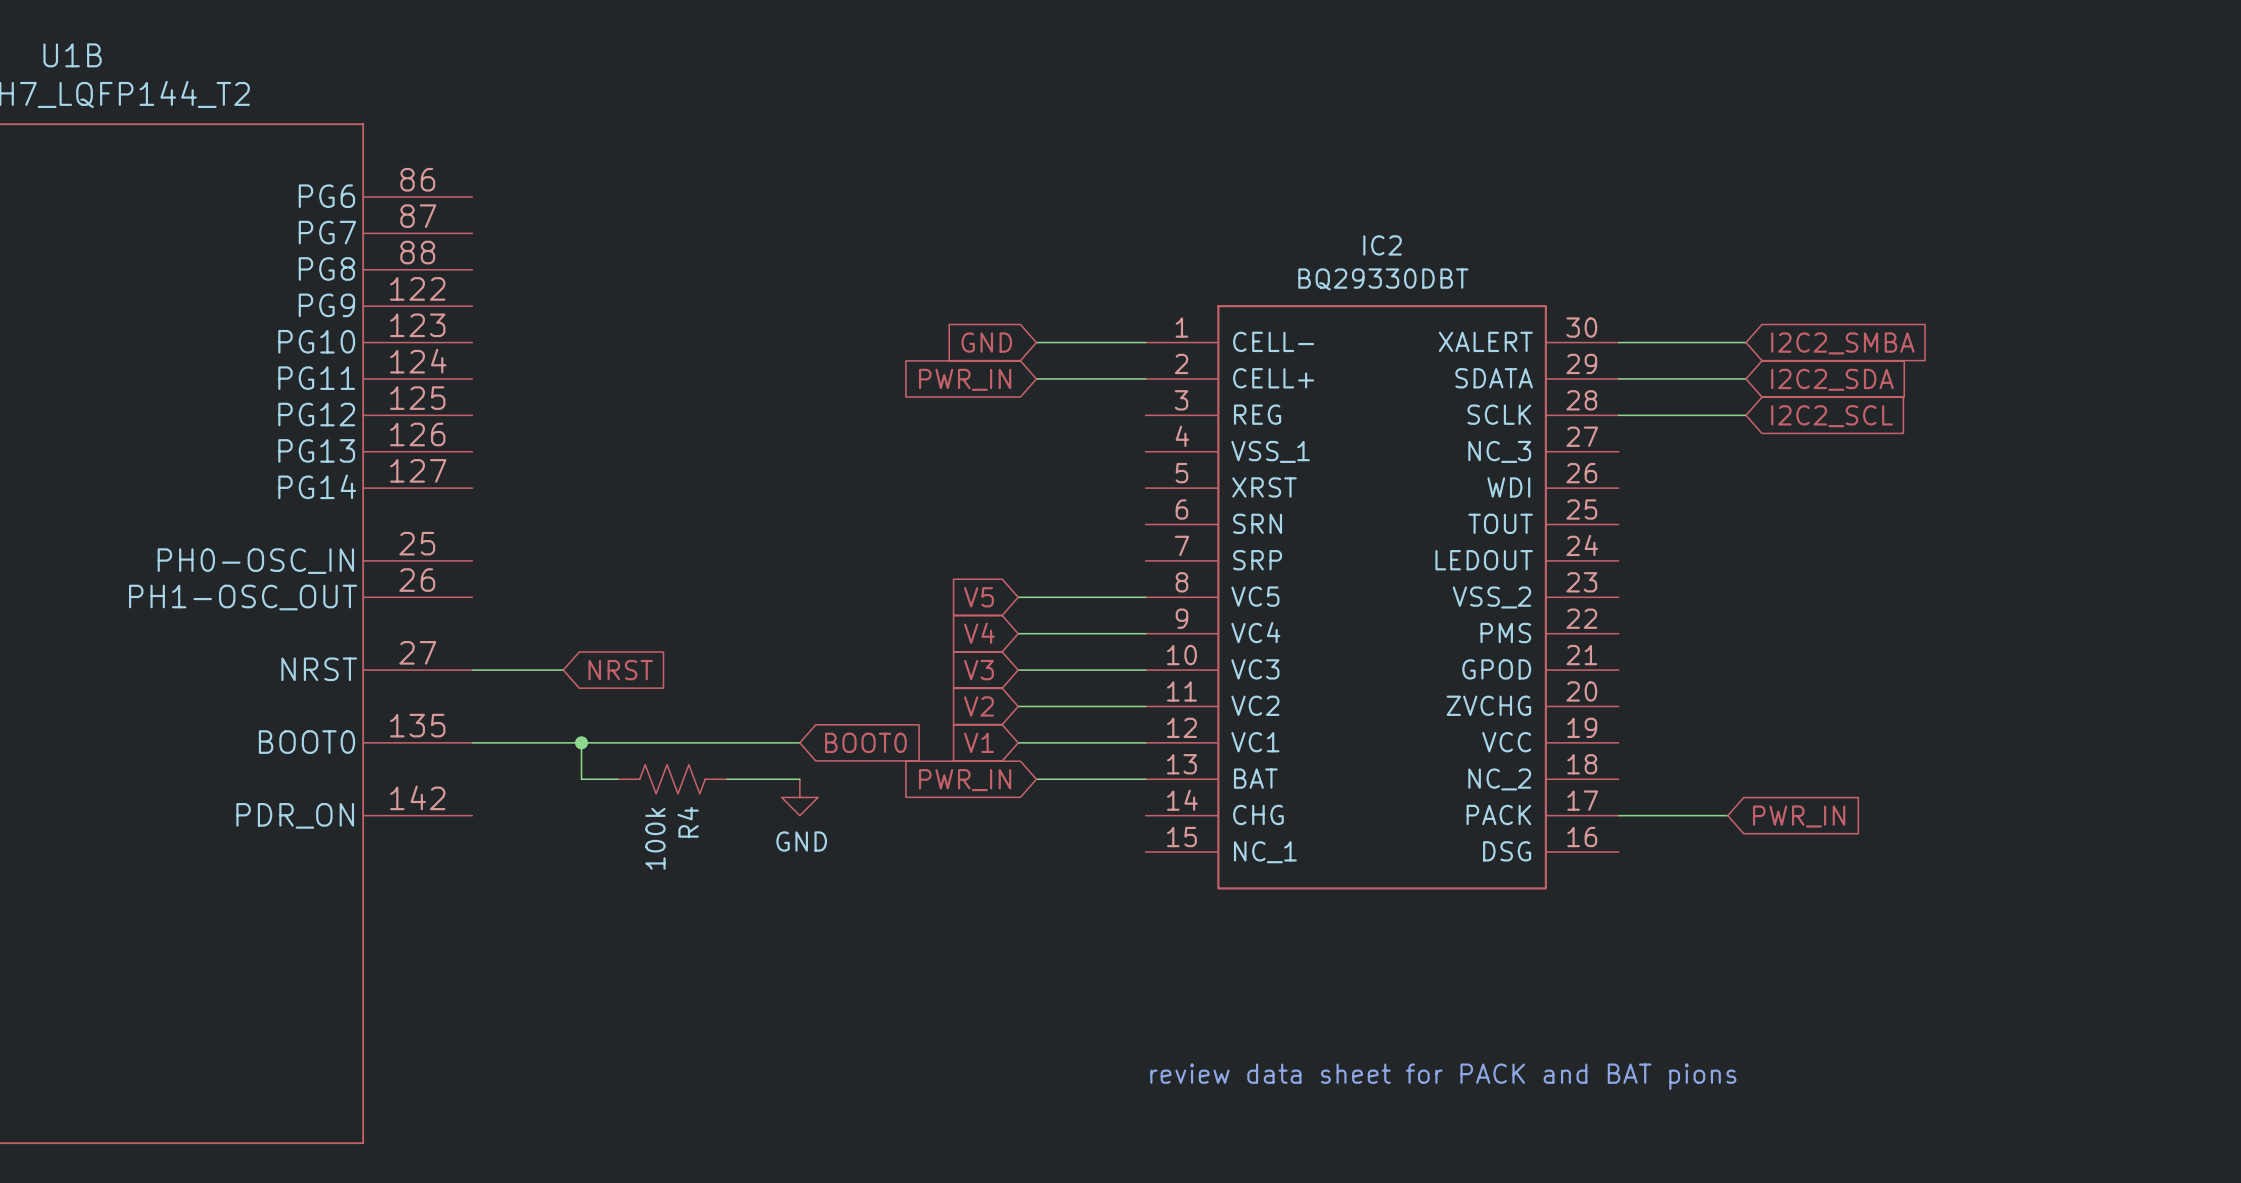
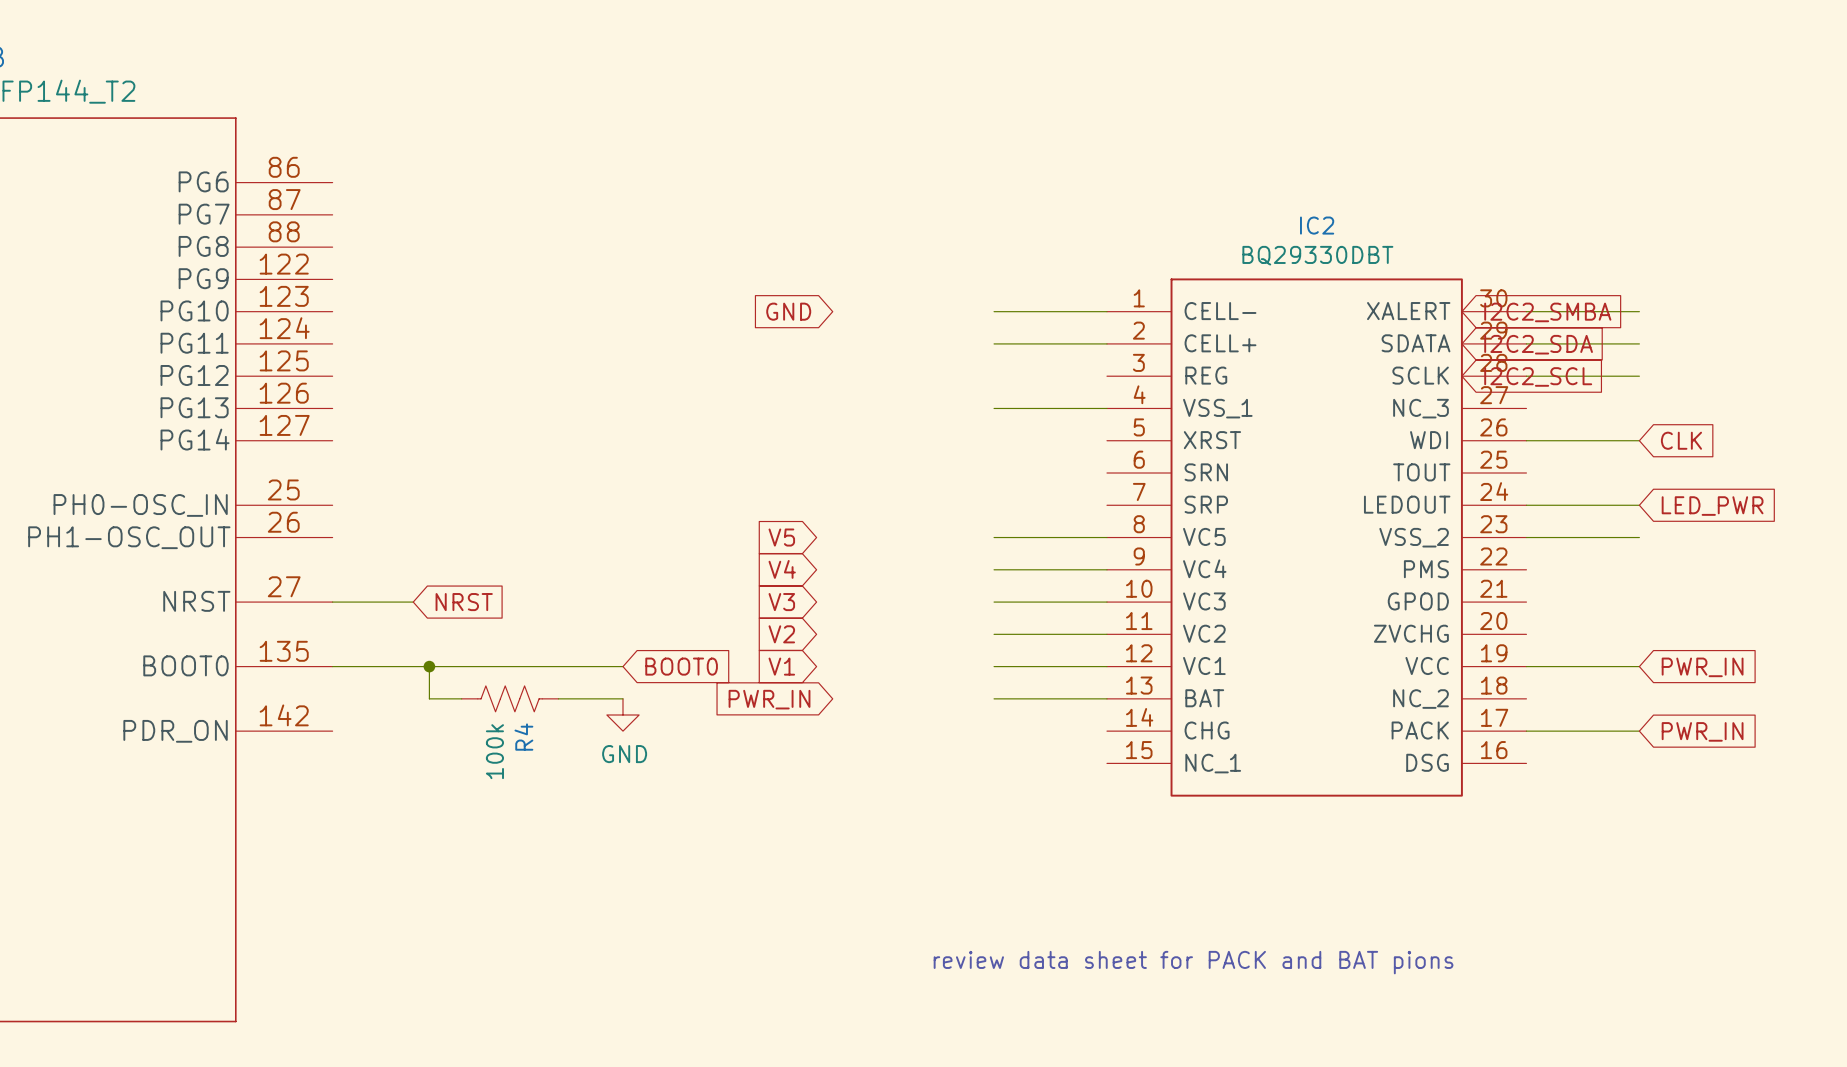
wire: (1036, 342) (1145, 342) -> none
wire: none -> (994, 311) (1106, 311)
wire: (1618, 342) (1746, 342) -> (1526, 311) (1639, 311)
wire: (1036, 378) (1145, 378) -> none
wire: none -> (994, 343) (1106, 343)
wire: (1618, 378) (1746, 378) -> (1526, 343) (1639, 343)
global label: PWR_IN (965, 379) -> none
wire: (1618, 415) (1746, 415) -> (1526, 376) (1639, 376)
wire: none -> (994, 408) (1106, 408)
wire: none -> (1526, 440) (1639, 440)
global label: none -> CLK (1681, 440)
wire: none -> (1526, 505) (1639, 505)
global label: none -> LED_PWR (1712, 506)
wire: (1018, 597) (1145, 597) -> (994, 537) (1106, 537)
IC2 position: (1382, 597) -> (1316, 537)
wire: none -> (1526, 537) (1639, 537)
wire: (1018, 633) (1145, 633) -> (994, 569) (1106, 569)
wire: (1018, 670) (1145, 670) -> (994, 602) (1106, 602)
wire: (1018, 706) (1145, 706) -> (994, 634) (1106, 634)
wire: (1018, 742) (1145, 742) -> (994, 666) (1106, 666)
wire: none -> (1526, 666) (1639, 666)
global label: none -> PWR_IN (1702, 667)
wire: (1036, 779) (1145, 779) -> none
wire: none -> (994, 698) (1106, 698)
wire: (1618, 815) (1727, 815) -> none
wire: none -> (1526, 731) (1639, 731)
global label: PWR_IN (1799, 816) -> none
global label: none -> PWR_IN (1702, 731)

